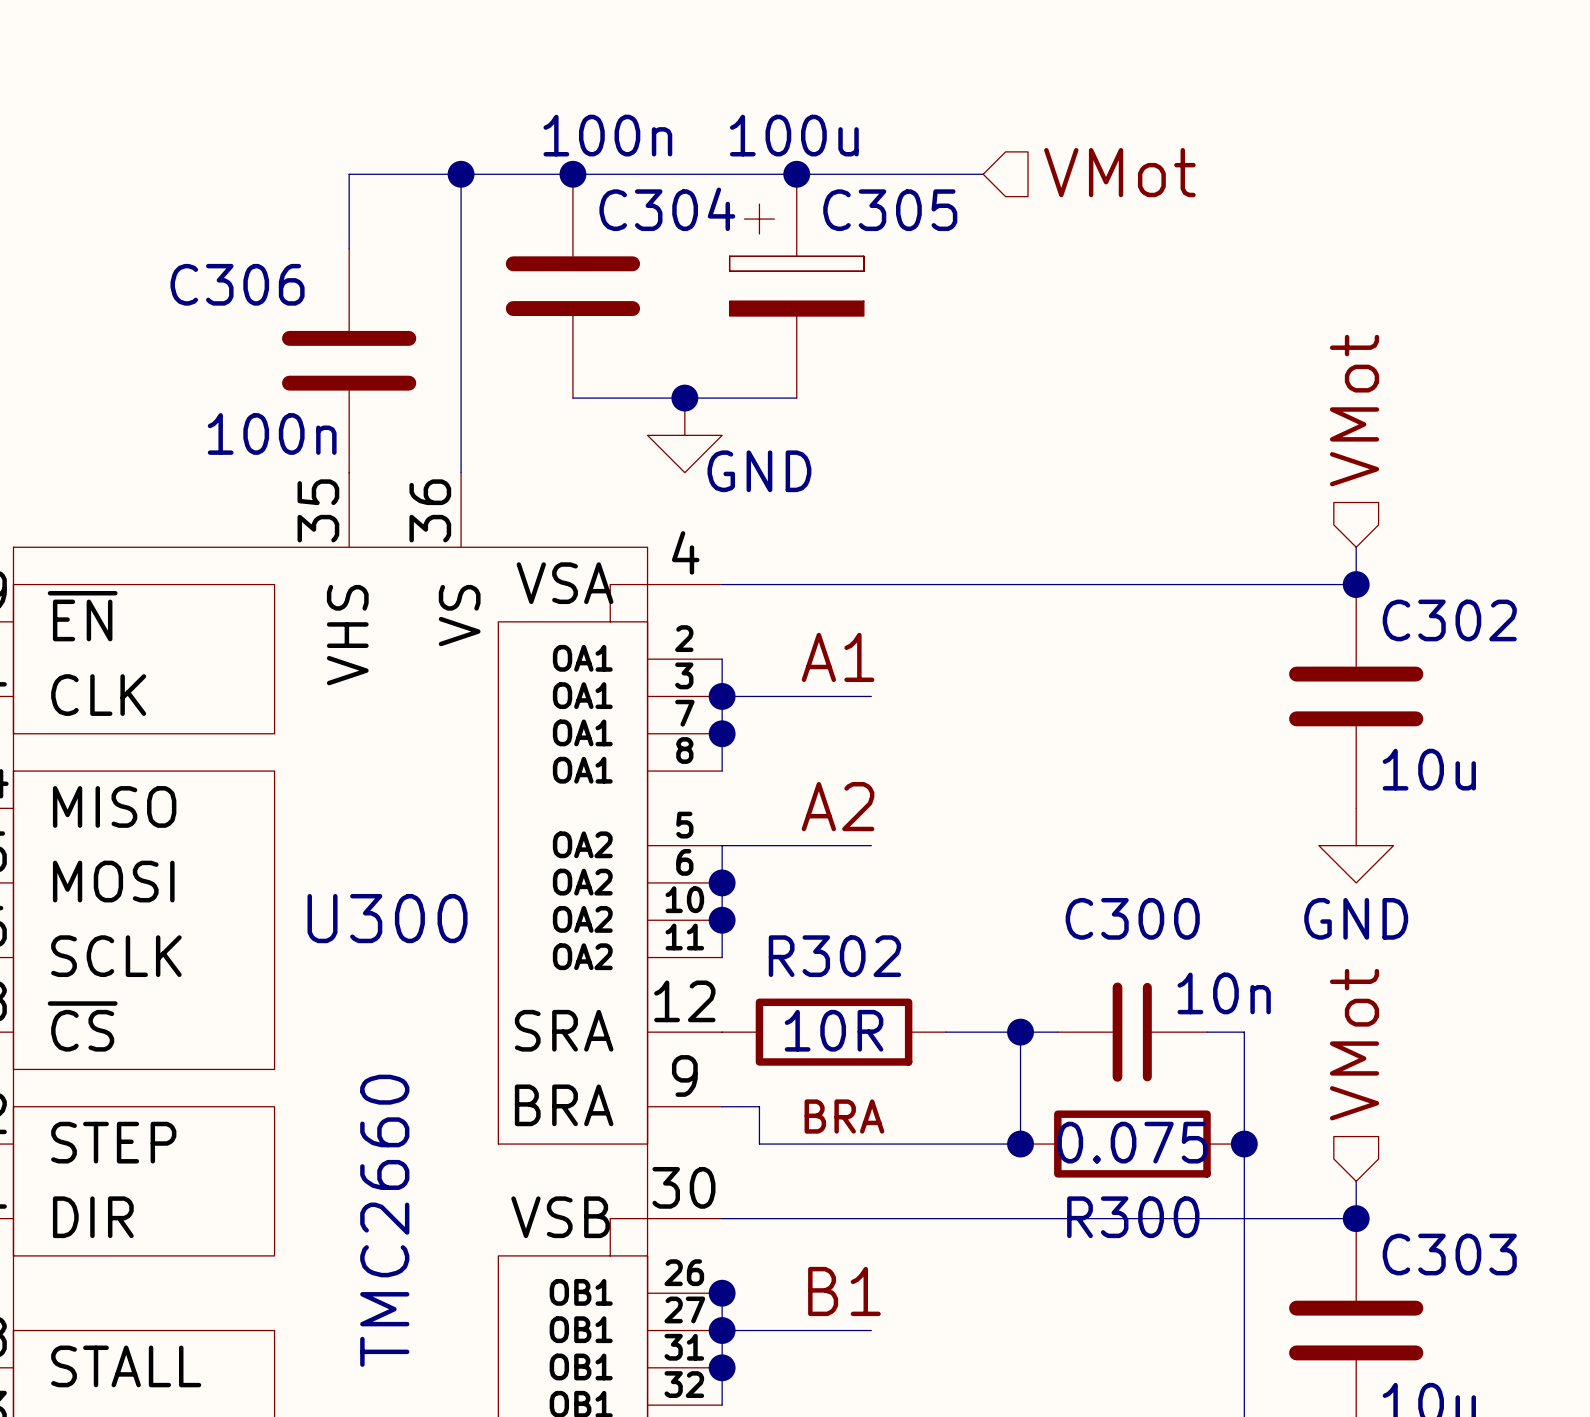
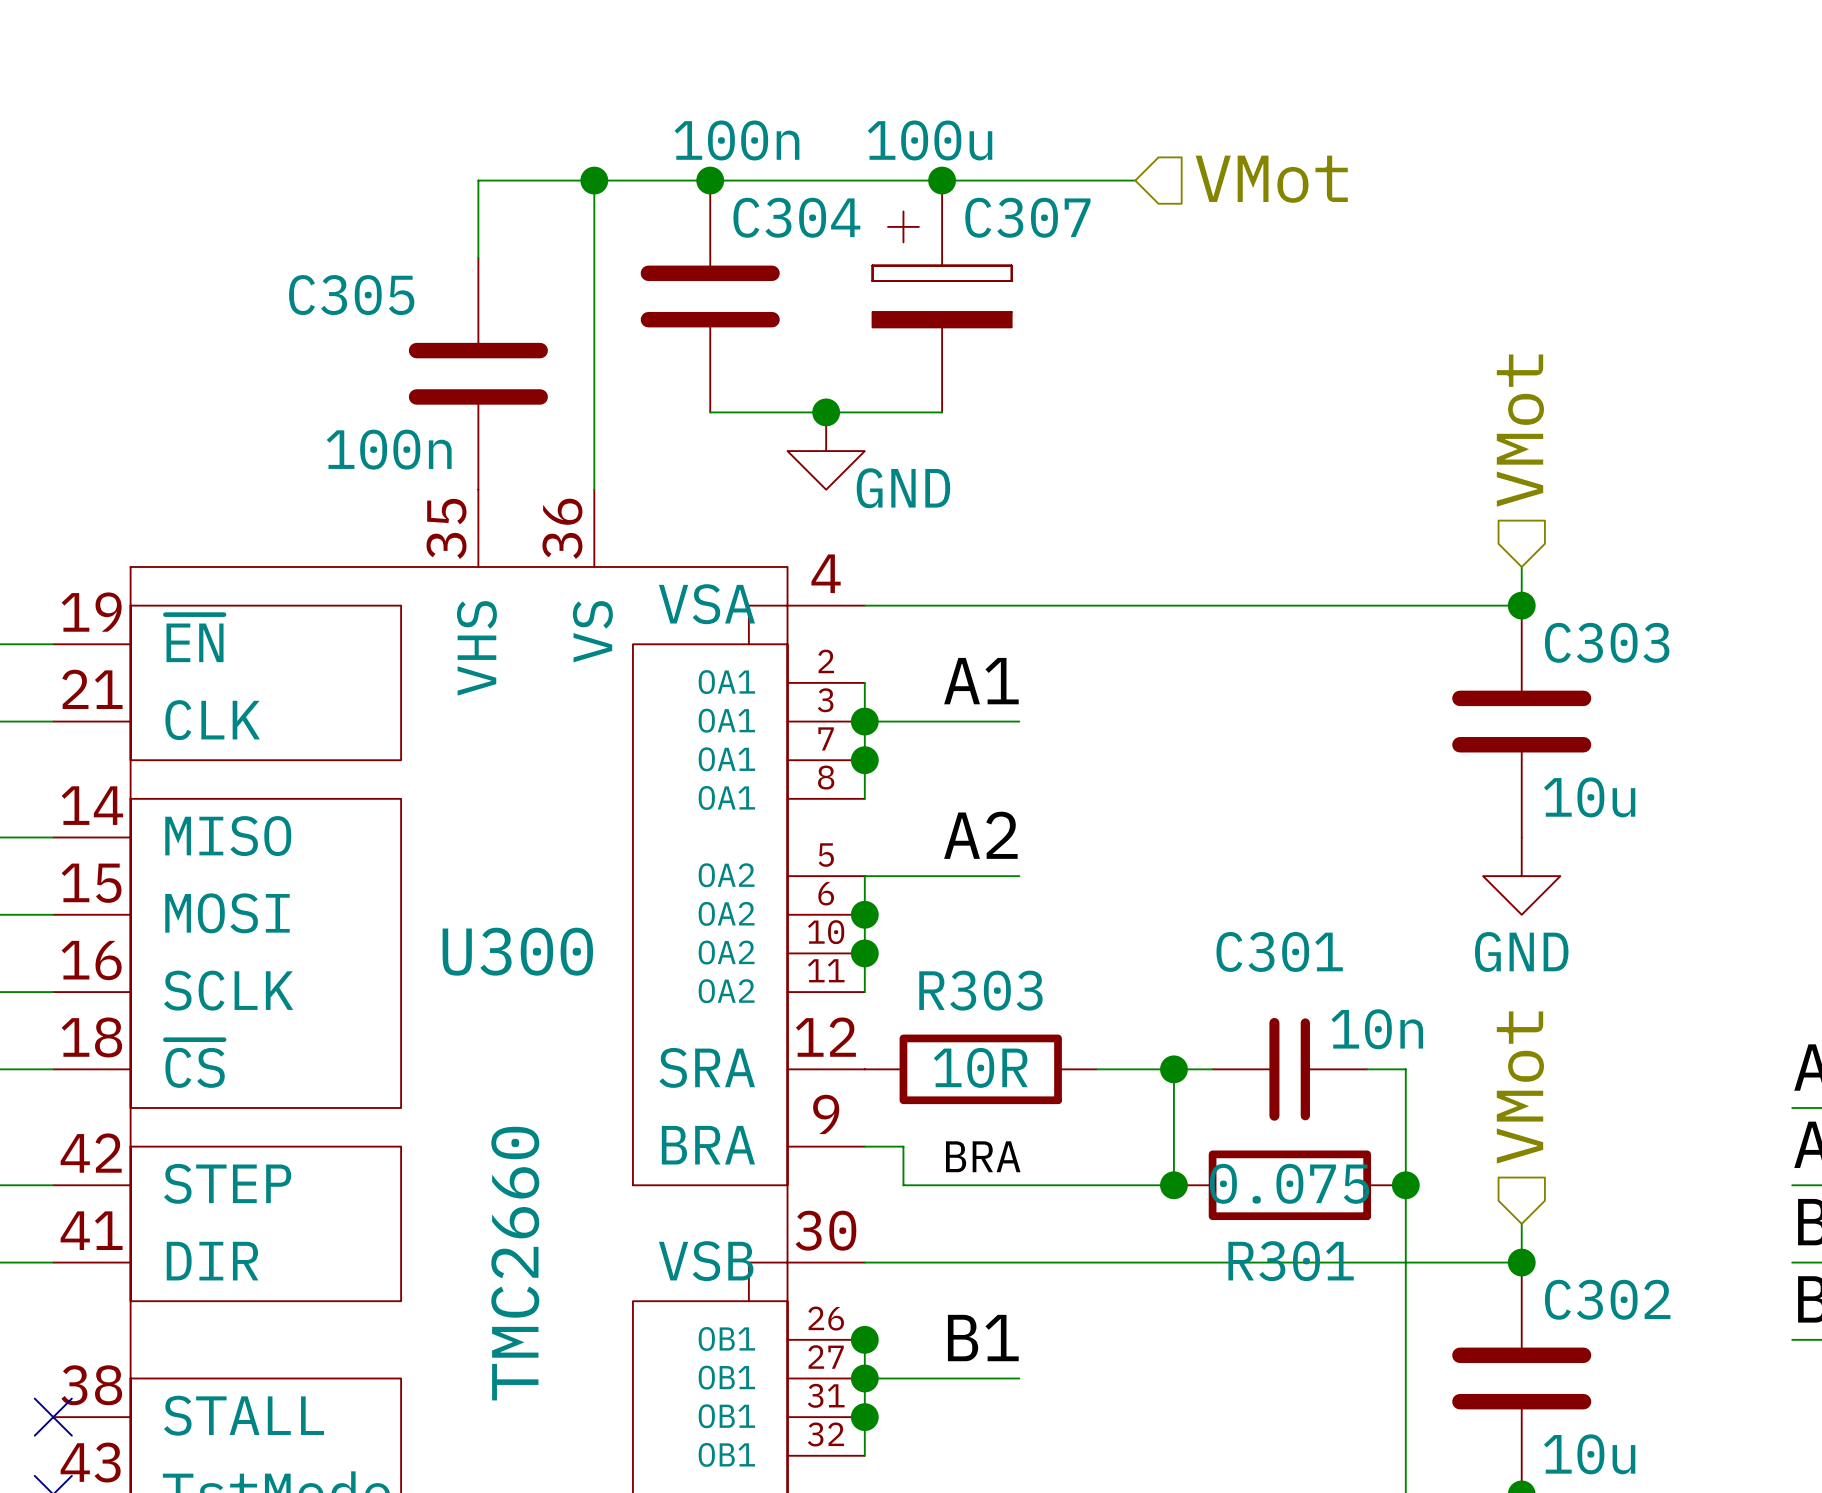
C305 name: C305 (890, 210) -> C307 (1027, 217)
C306 name: C306 (237, 284) -> C305 (351, 295)
C302 name: C302 (1449, 620) -> C303 (1607, 642)
C300 name: C300 (1132, 918) -> C301 (1279, 951)
R302 name: R302 (834, 956) -> R303 (980, 990)
R300 name: R300 (1133, 1217) -> R301 (1291, 1261)
C303 name: C303 (1449, 1254) -> C302 (1607, 1299)

